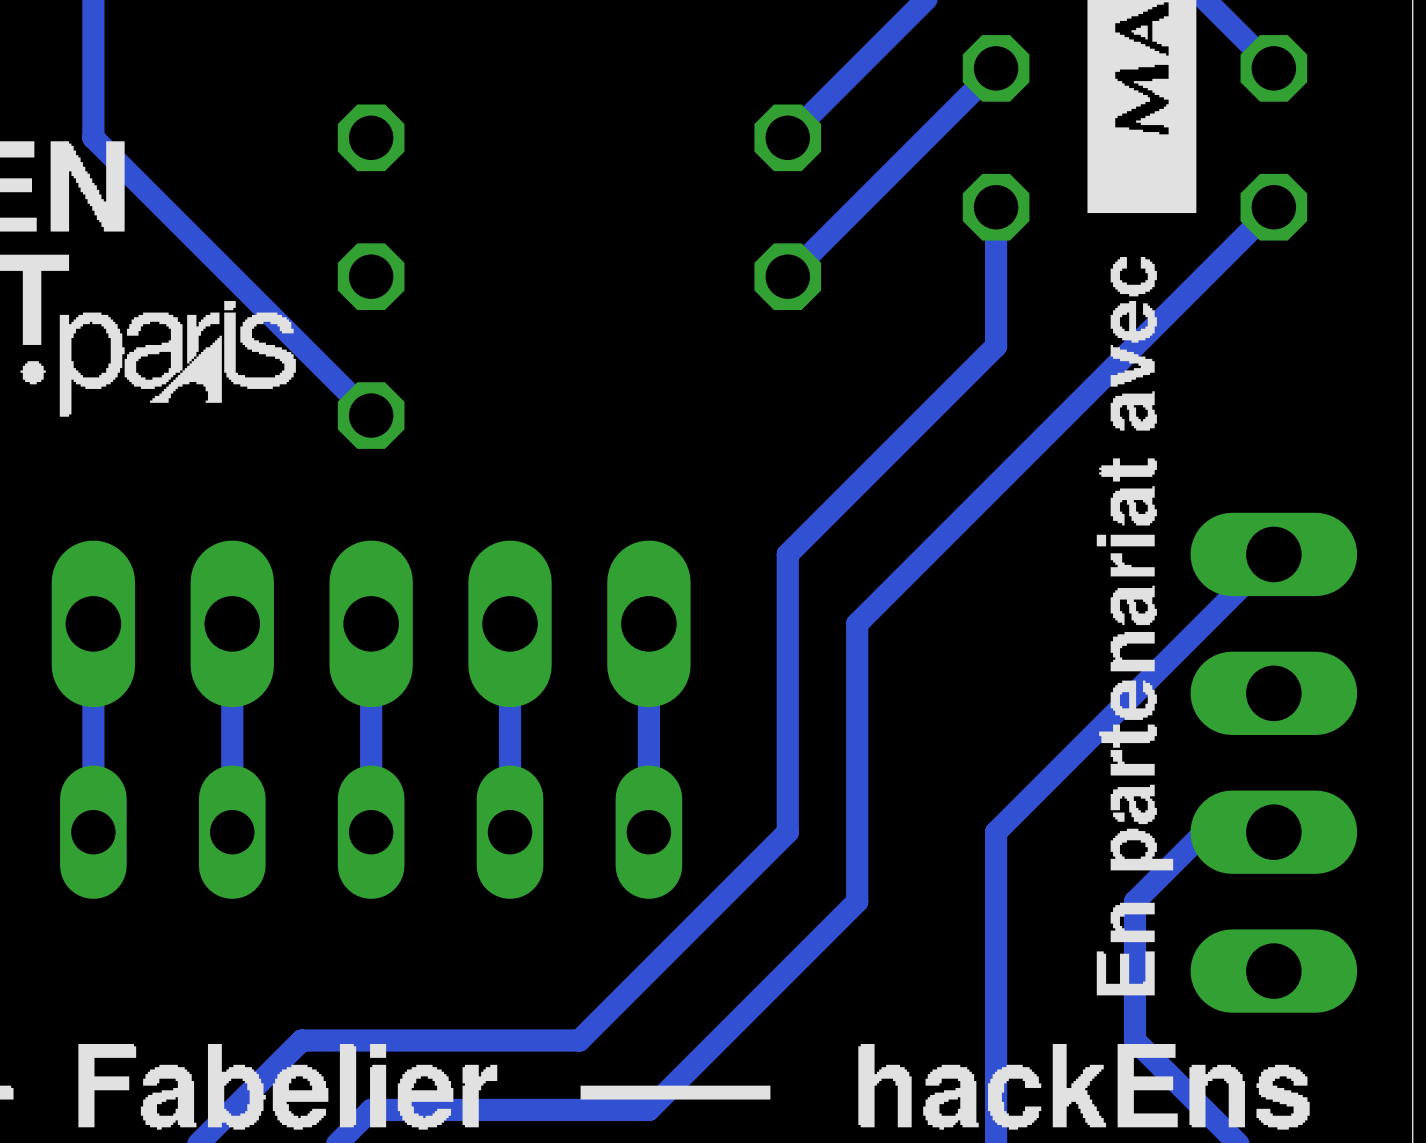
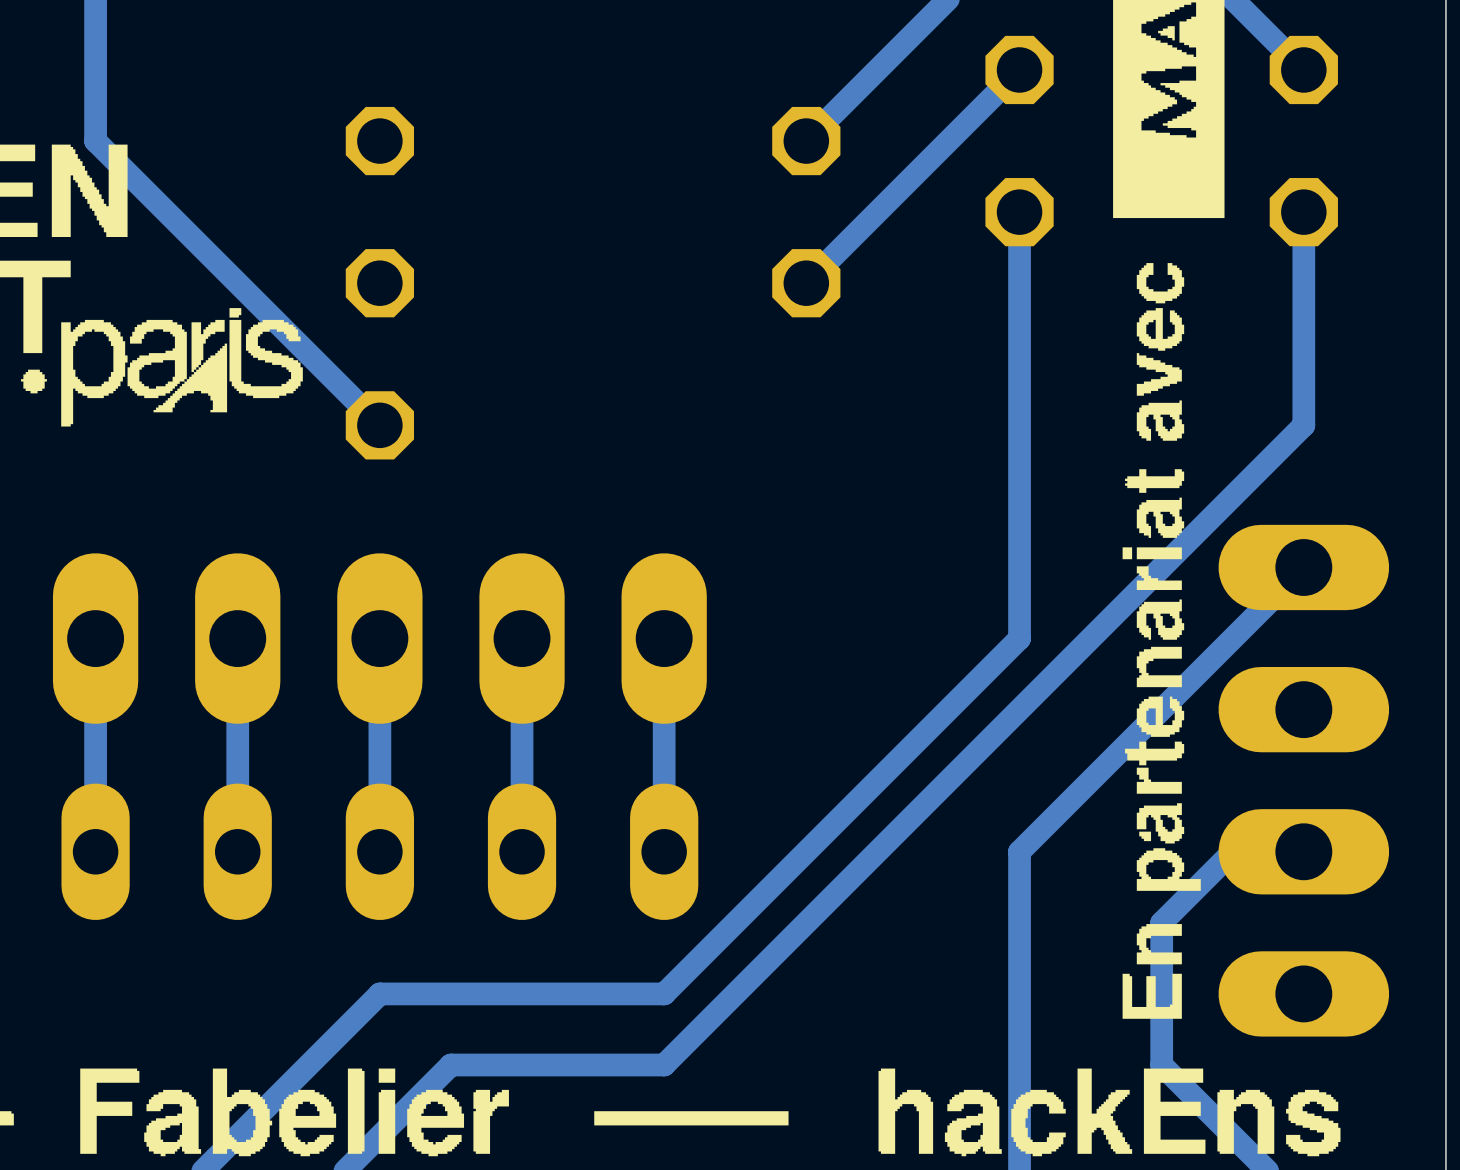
track: (1273, 207) (857, 623) (857, 901) (648, 1109) (371, 1109) -> (1303, 212) (1303, 425) (664, 1065) (593, 1065)
track: (996, 346) (787, 554) (787, 832) -> (1019, 354) (1019, 638) (806, 851)
track: (648, 971) (579, 1040) -> (664, 993) (379, 993) (308, 1065)
track: (440, 1040) (301, 1040) -> (450, 1065) (379, 1136)

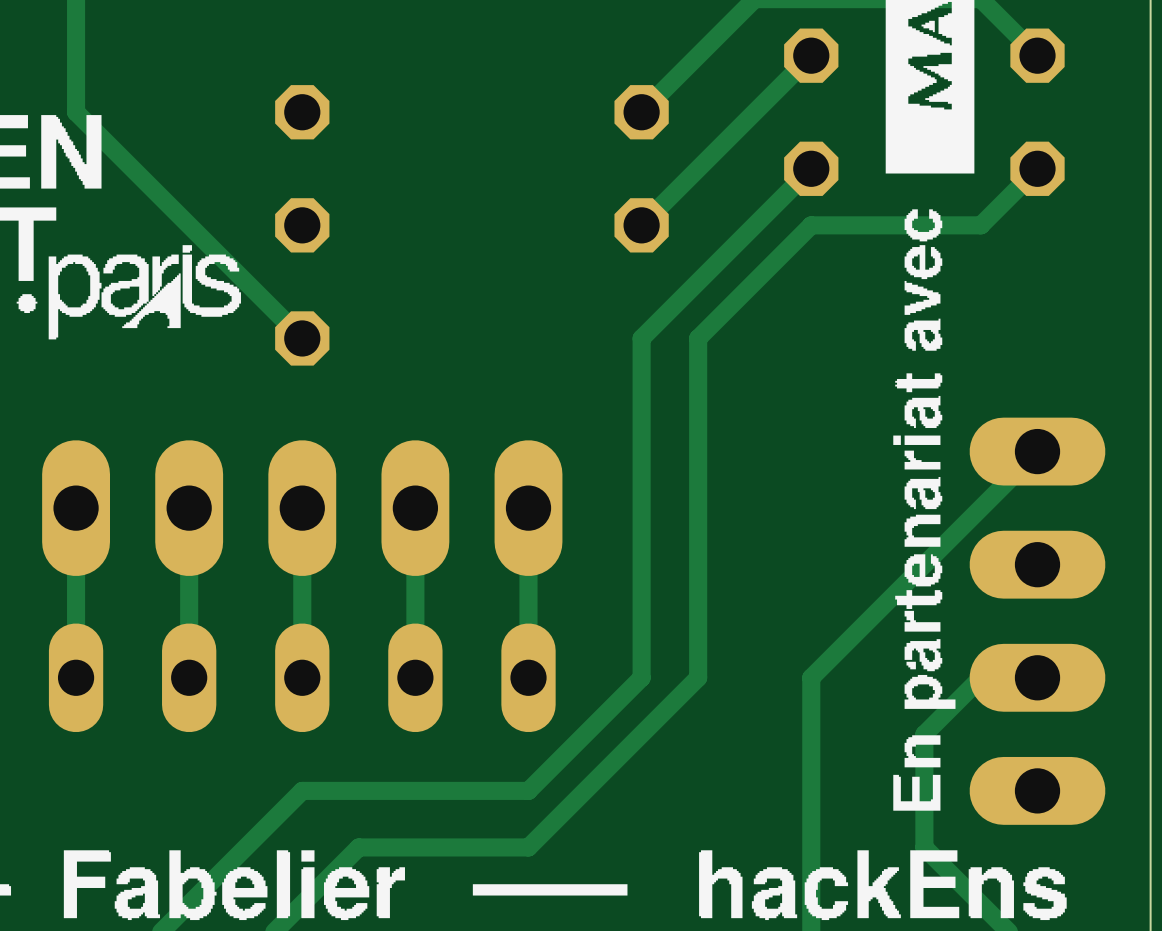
track: (1019, 212) (1019, 638) (806, 851) -> (811, 168) (641, 338) (641, 677)
track: (1303, 212) (1303, 425) (877, 851) -> (1037, 168) (980, 225) (811, 225) (698, 338) (698, 677)

